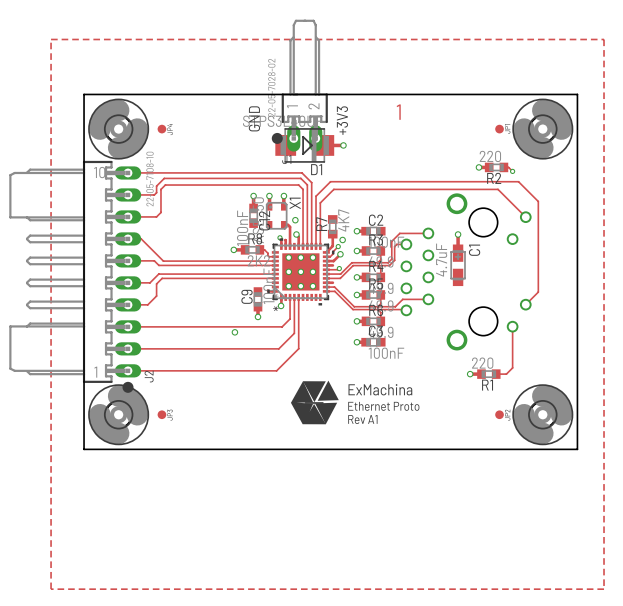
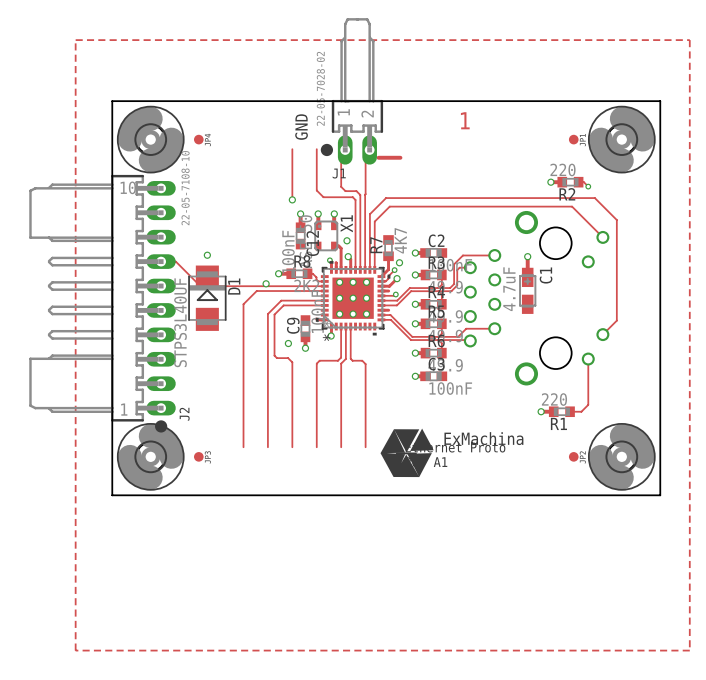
text: +3V3 (342, 120) -> none
track: none -> (292, 149) (292, 199)
track: none -> (365, 149) (365, 194)
D1 rotation: 0° (304, 145) -> 90° counterclockwise (207, 298)
D1 position: (304, 145) -> (207, 298)
via: (343, 145) -> none
track: (128, 172) (301, 172) (311, 182) -> (365, 194) (365, 199)
via: none -> (292, 199)
track: (307, 184) (300, 178) (164, 178) (156, 186) (156, 192) (154, 194) (128, 194) -> (360, 201) (360, 194) (356, 191) (345, 191) (341, 186) (341, 149)
track: (303, 189) (298, 185) (165, 185) (160, 189) (160, 212) (156, 216) (128, 216) -> (355, 206) (355, 199) (352, 197) (323, 197) (316, 190) (316, 149)
via: none -> (207, 255)
via: none -> (266, 283)
track: (128, 260) (154, 260) (158, 265) (214, 265) -> (243, 447) (243, 304) (256, 291)
track: (236, 274) (158, 274) (149, 282) (128, 282) -> (281, 300) (267, 314) (267, 447)
track: (238, 278) (162, 278) (156, 283) (156, 296) (147, 304) (128, 304) -> (283, 305) (274, 314) (274, 355) (276, 358) (288, 358) (292, 362) (292, 447)
track: (290, 318) (282, 326) (128, 326) -> (341, 350) (341, 357) (338, 360) (319, 360) (316, 363) (316, 447)
track: (294, 326) (294, 333) (278, 348) (128, 348) -> (345, 358) (341, 363) (341, 447)
track: (298, 326) (298, 348) (276, 370) (128, 370) -> (350, 358) (352, 360) (362, 360) (365, 364) (365, 447)
via position: (234, 332) -> (288, 343)
drawing position: (314, 402) -> (407, 452)

